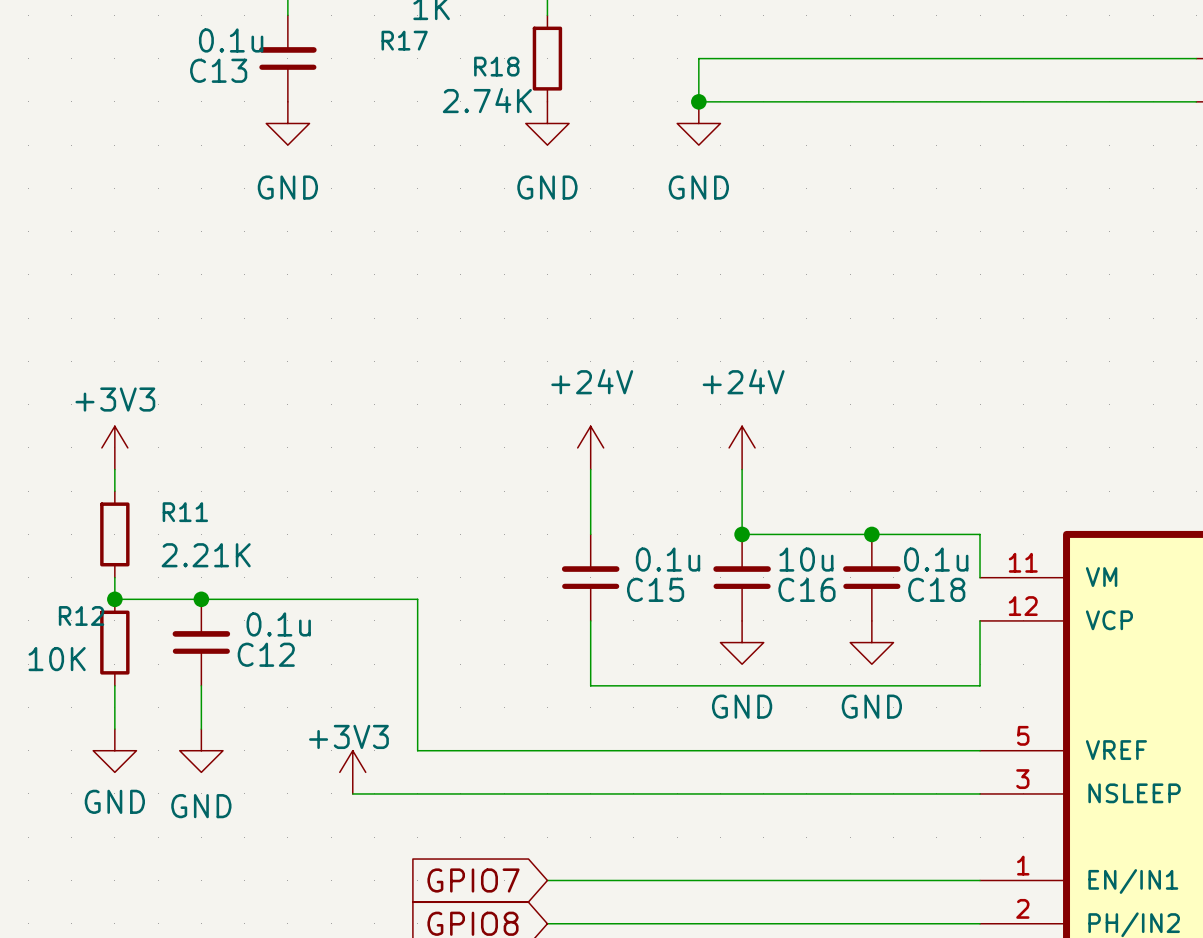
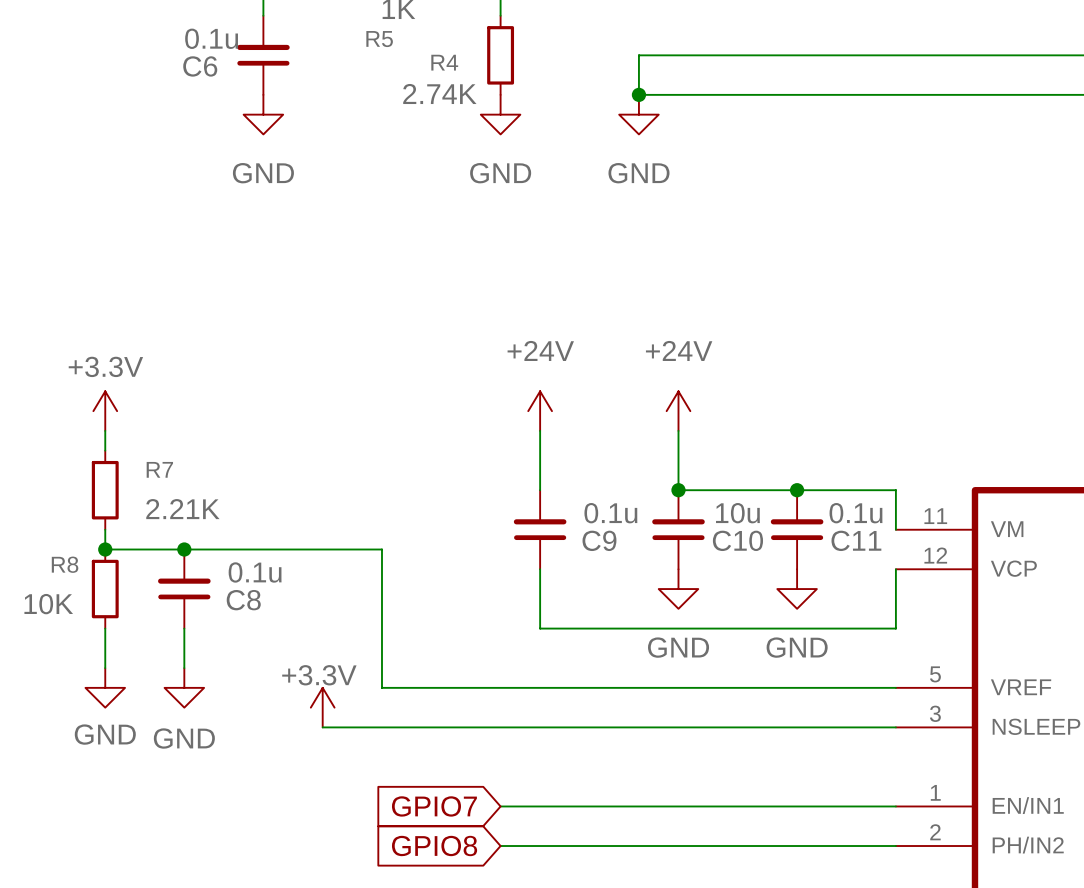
R17 name: R17 (404, 40) -> R5 (379, 39)
R18 name: R18 (496, 66) -> R4 (444, 62)
C13 name: C13 (218, 70) -> C6 (200, 66)
power symbol: +3V3 (114, 447) -> +3.3V (105, 411)
R11 name: R11 (185, 512) -> R7 (159, 469)
C15 name: C15 (655, 589) -> C9 (599, 540)
C16 name: C16 (806, 589) -> C10 (737, 540)
C18 name: C18 (936, 589) -> C11 (856, 540)
R12 name: R12 (81, 615) -> R8 (65, 564)
C12 name: C12 (266, 654) -> C8 (243, 600)
power symbol: +3V3 (352, 772) -> +3.3V (322, 707)

